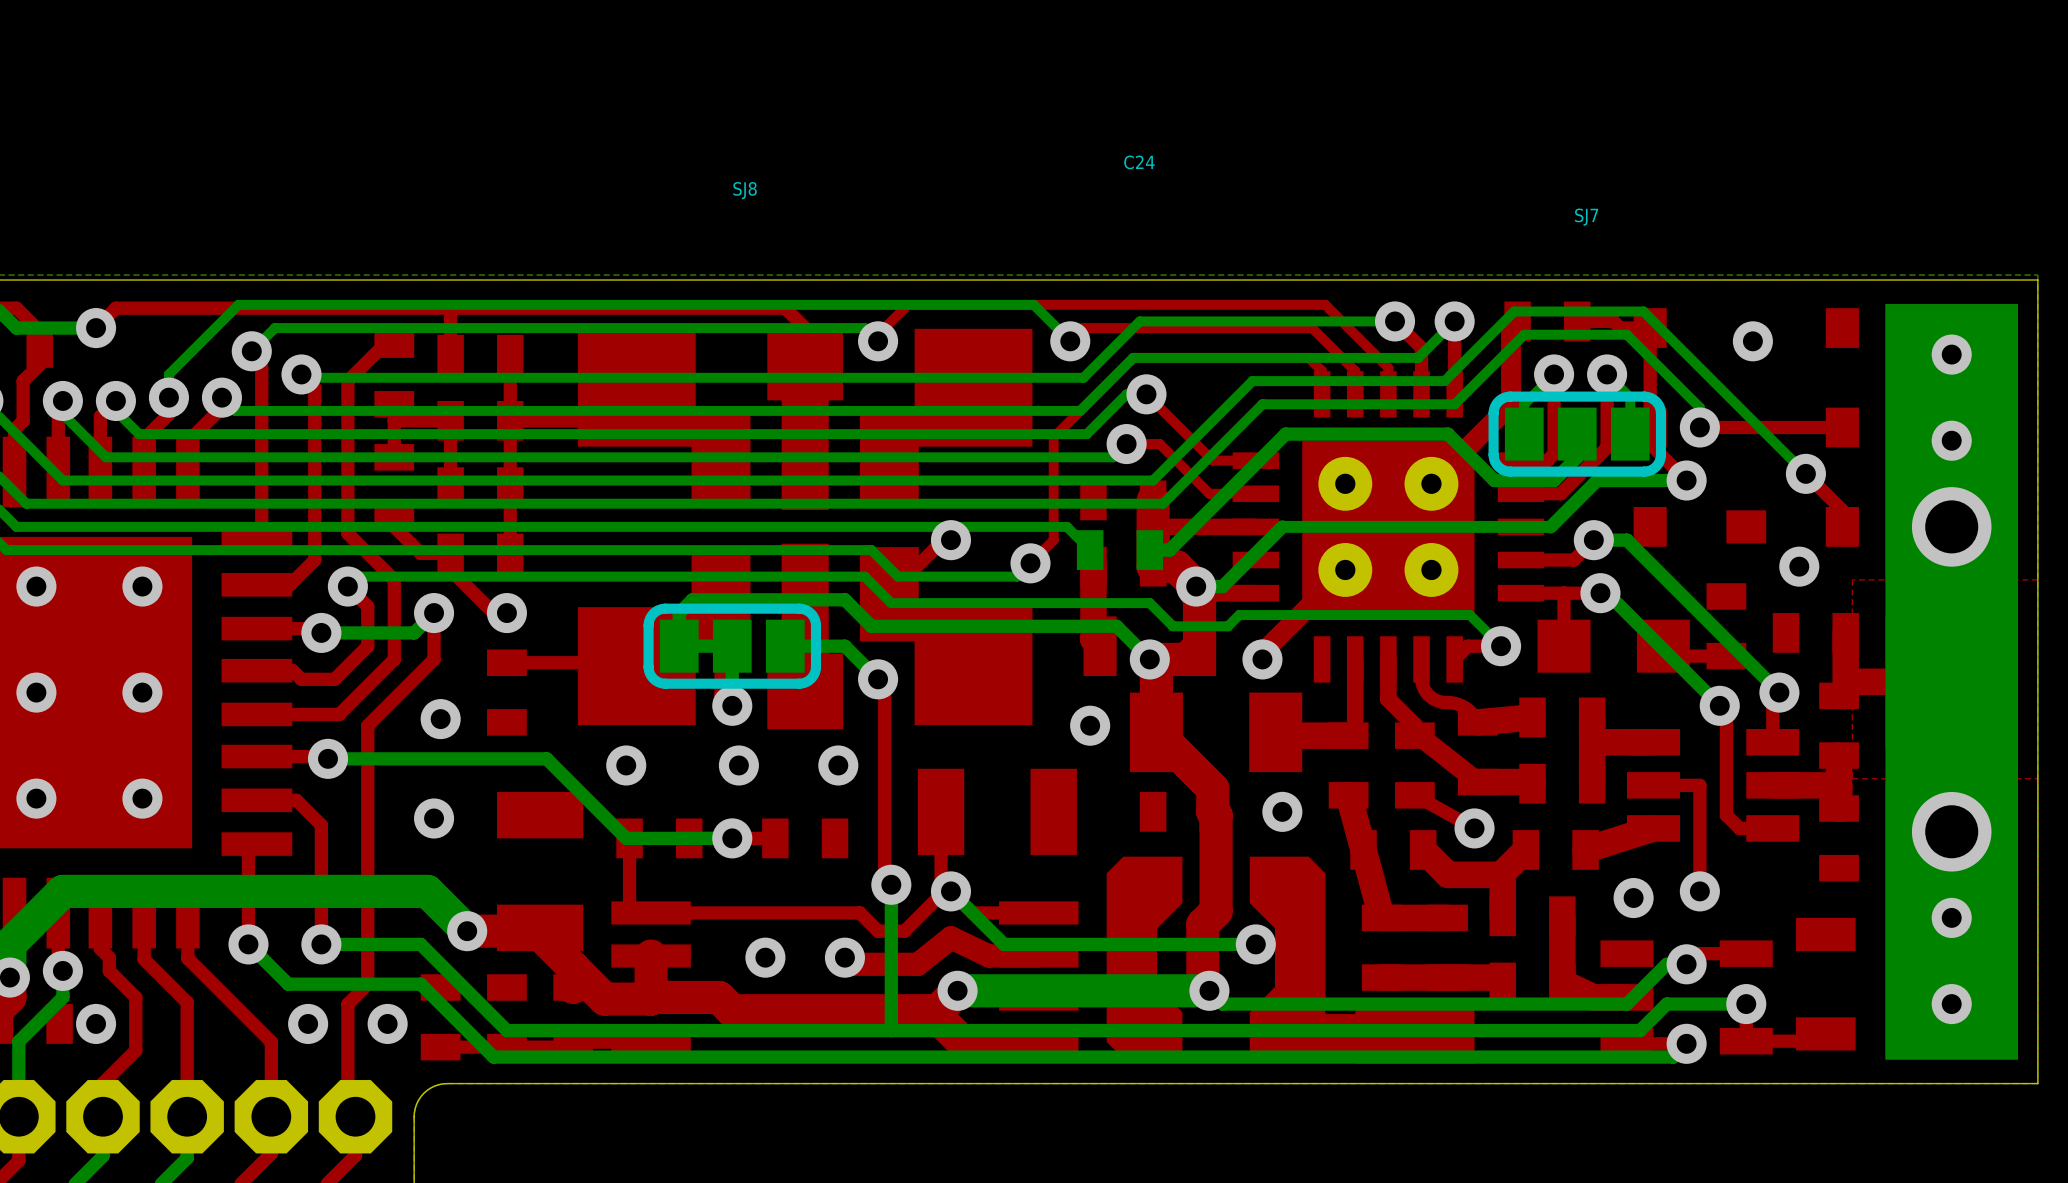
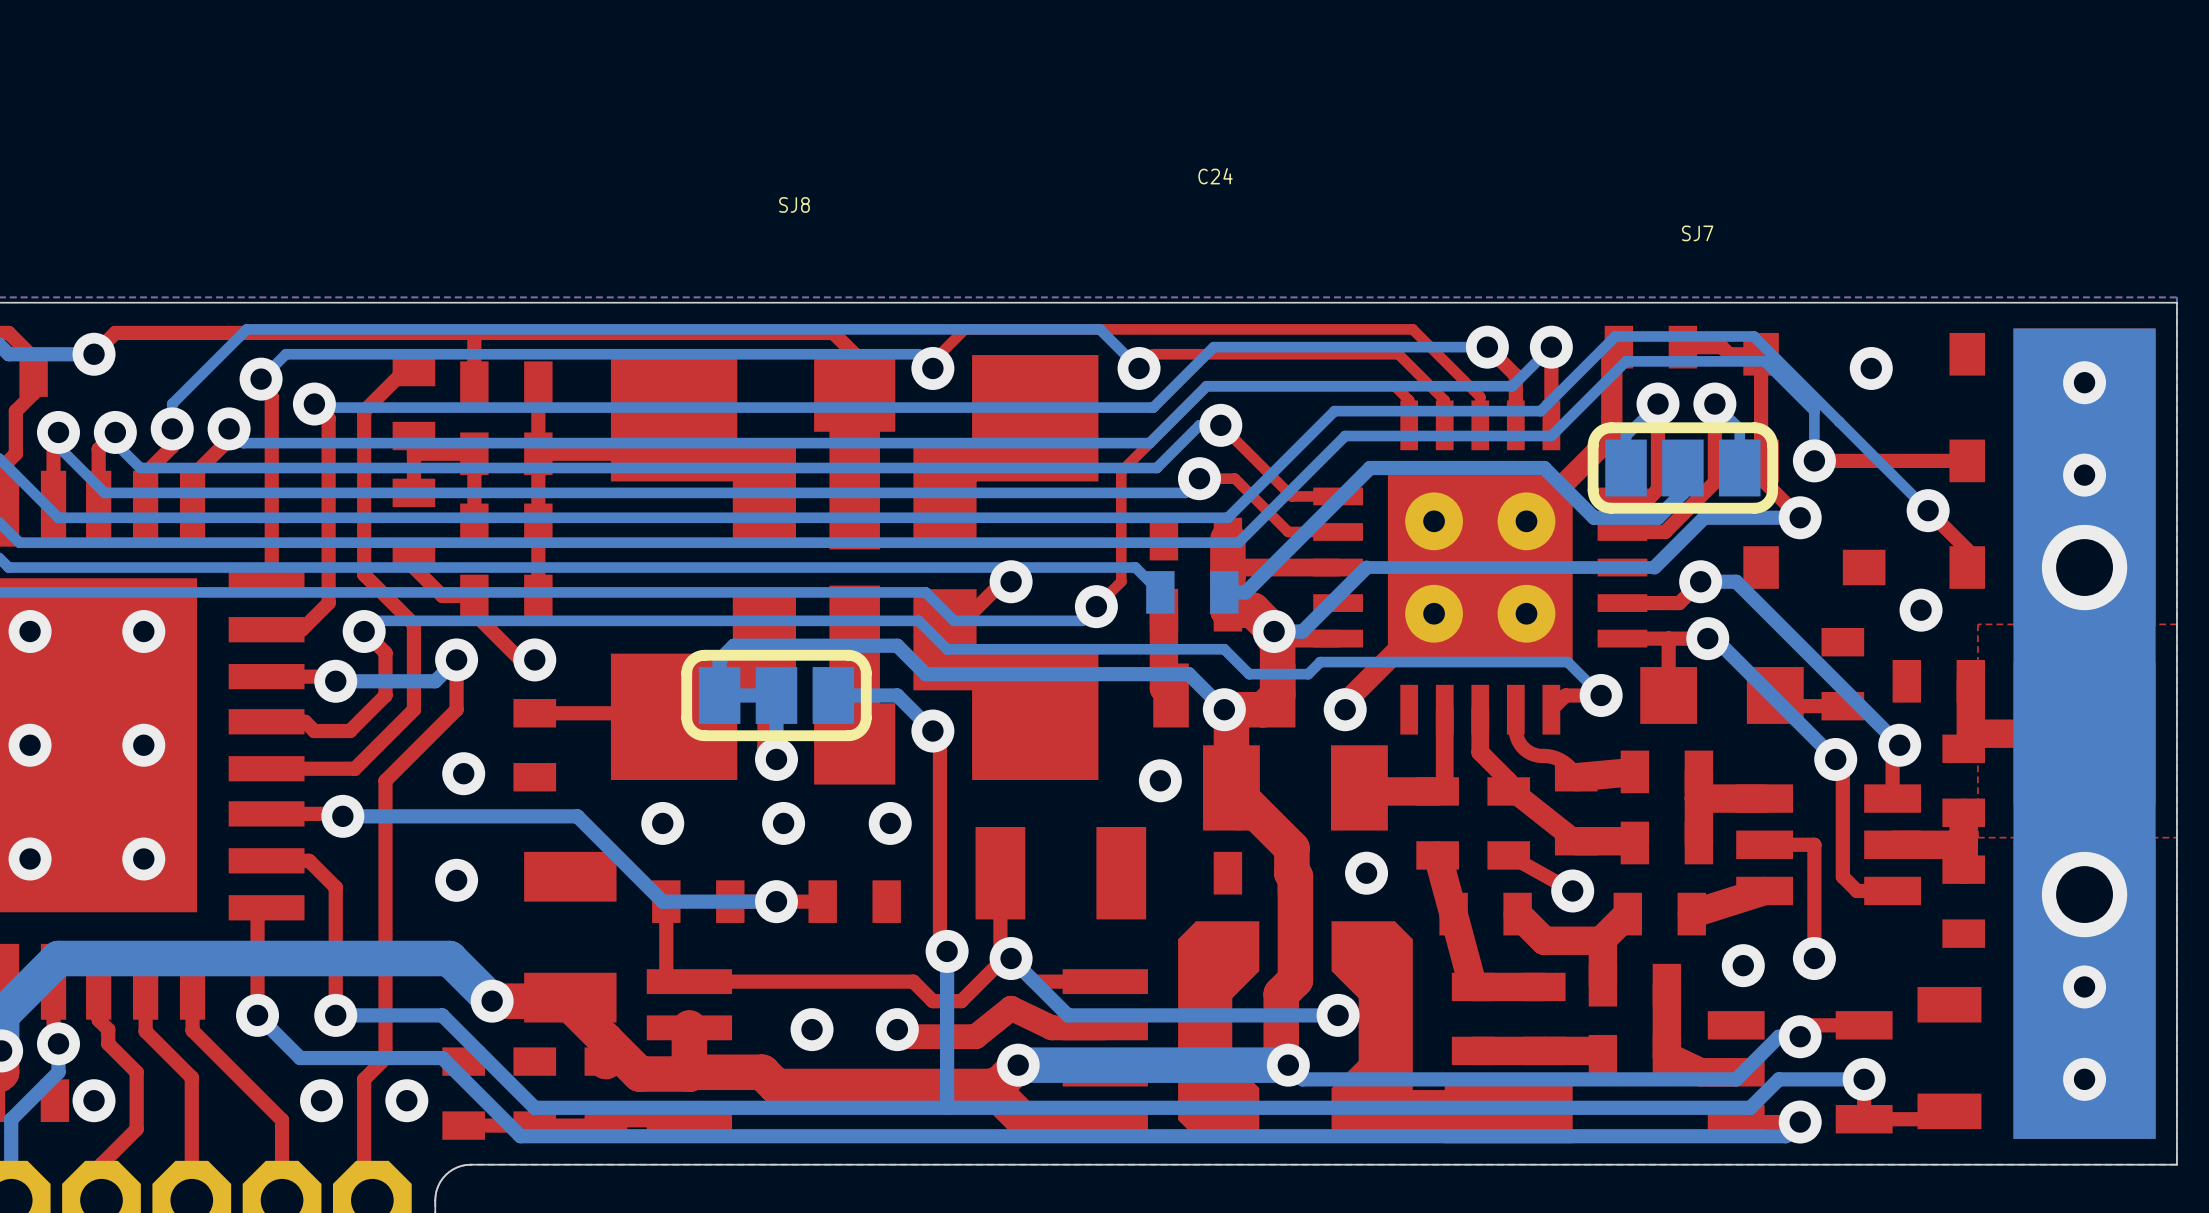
bottom track: (1626, 334) (1699, 407) -> (1736, 361) (1764, 361) (1814, 411) (1814, 439)

